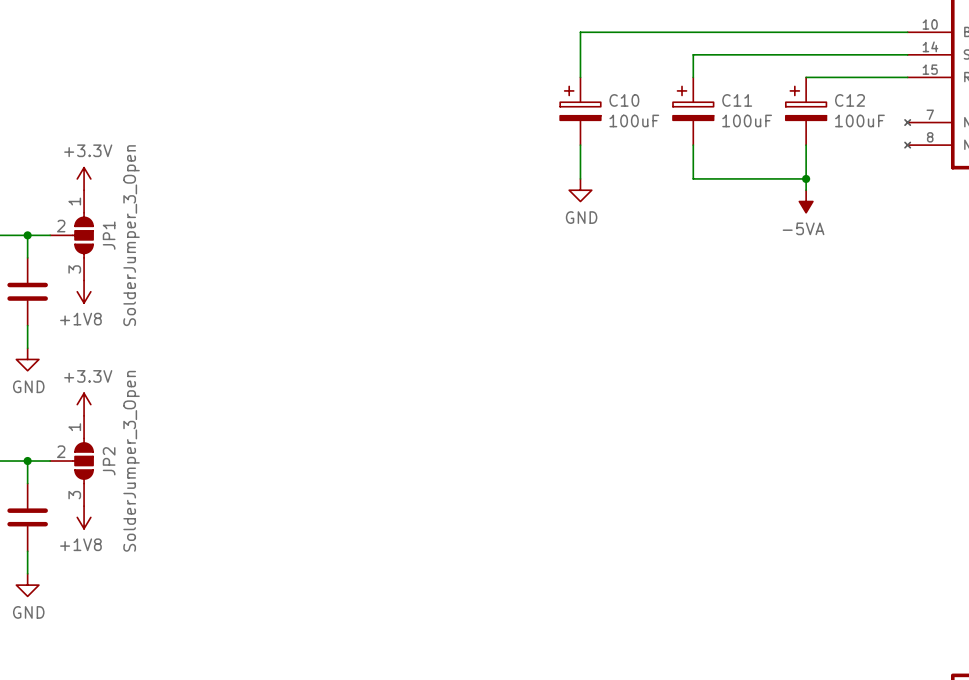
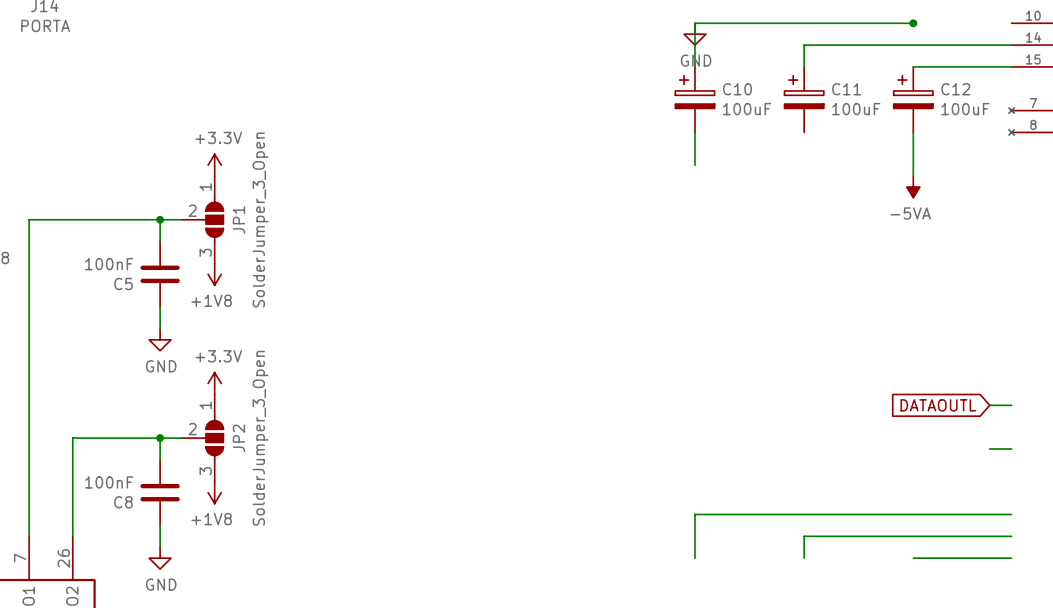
wire: (806, 32) (907, 32) -> none
junction: none -> (913, 23)
wire: (693, 145) (693, 178) (806, 178) -> none
junction: (806, 178) -> none
power symbol position: GND (580, 190) -> GND (694, 34)
global label: none -> DATAOUTL (938, 405)
wire: none -> (989, 405) (1011, 405)
wire: none -> (989, 449) (1011, 449)
wire: none -> (1011, 514) (694, 514) (694, 558)
wire: none -> (1011, 536) (804, 536) (804, 558)
wire: none -> (913, 558) (1011, 558)

